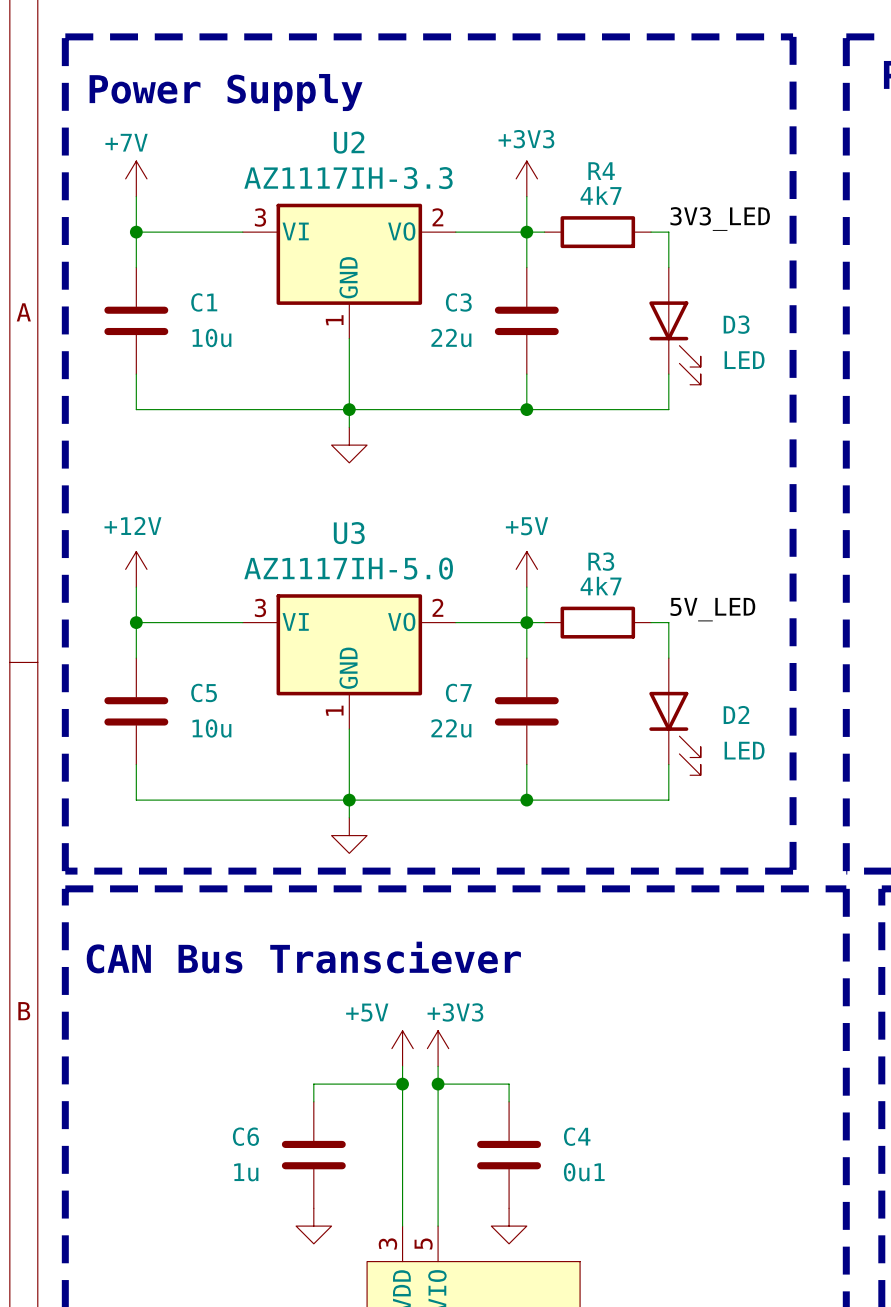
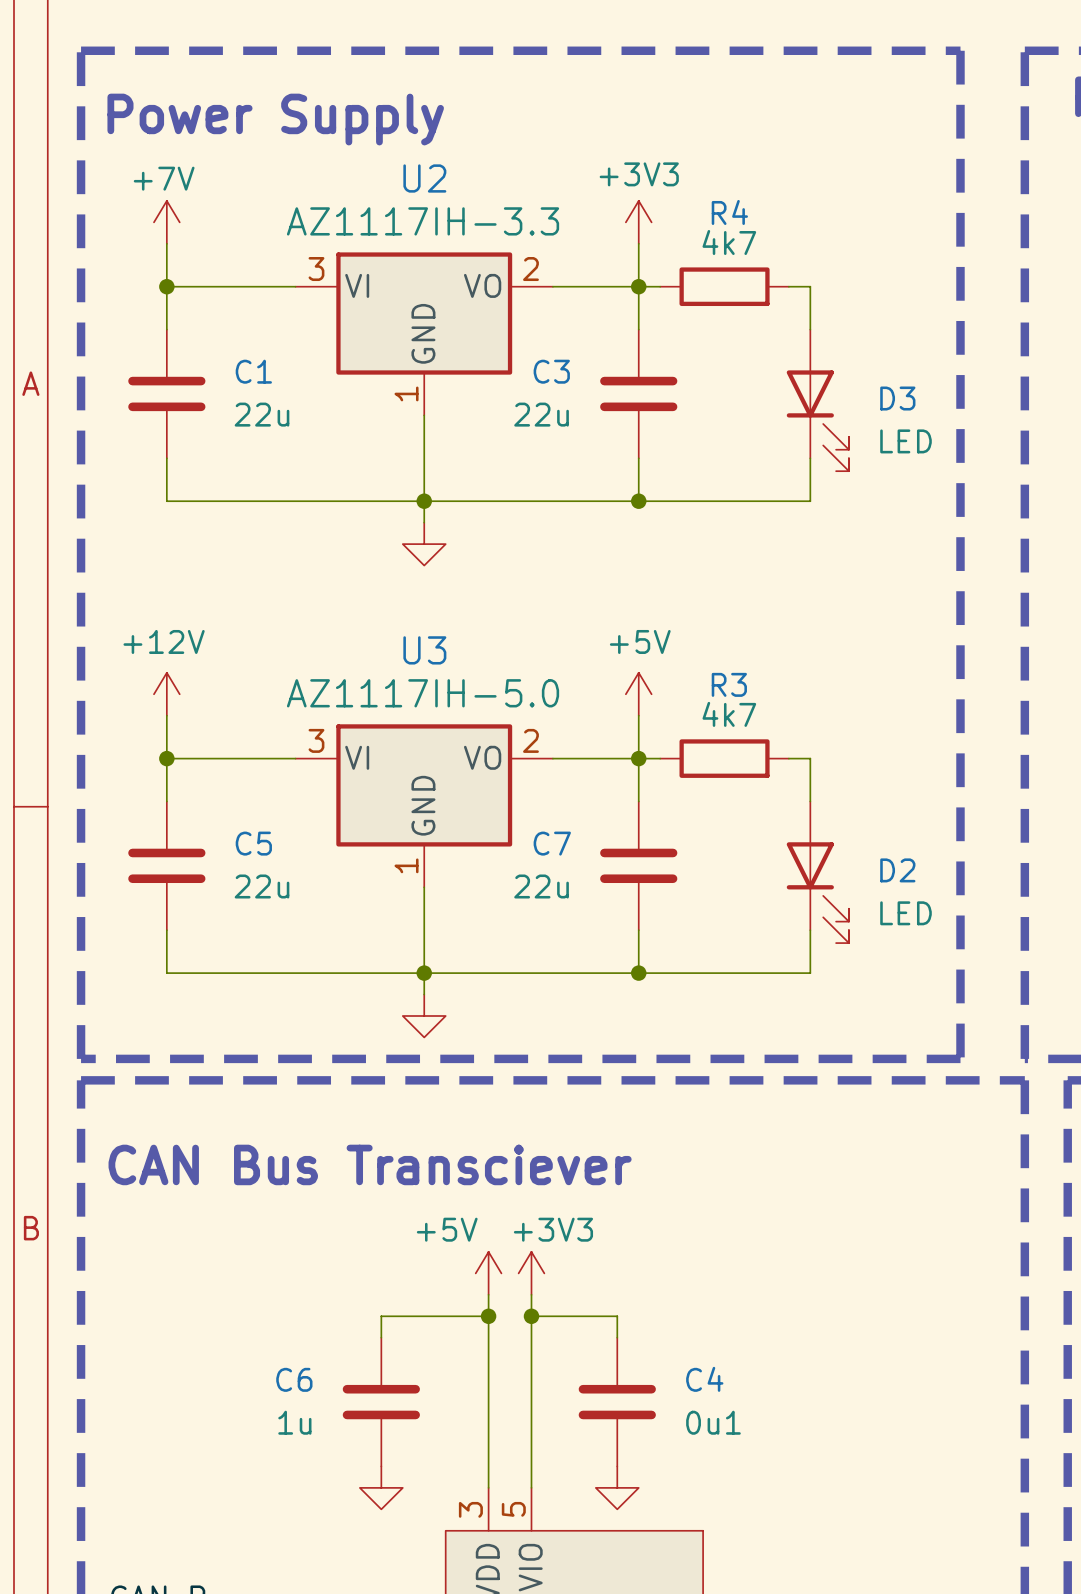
label: 3V3_LED (720, 218) -> none
C1 value: 10u (211, 337) -> 22u (262, 414)
label: 5V_LED (712, 609) -> none
C5 value: 10u (211, 728) -> 22u (262, 886)

